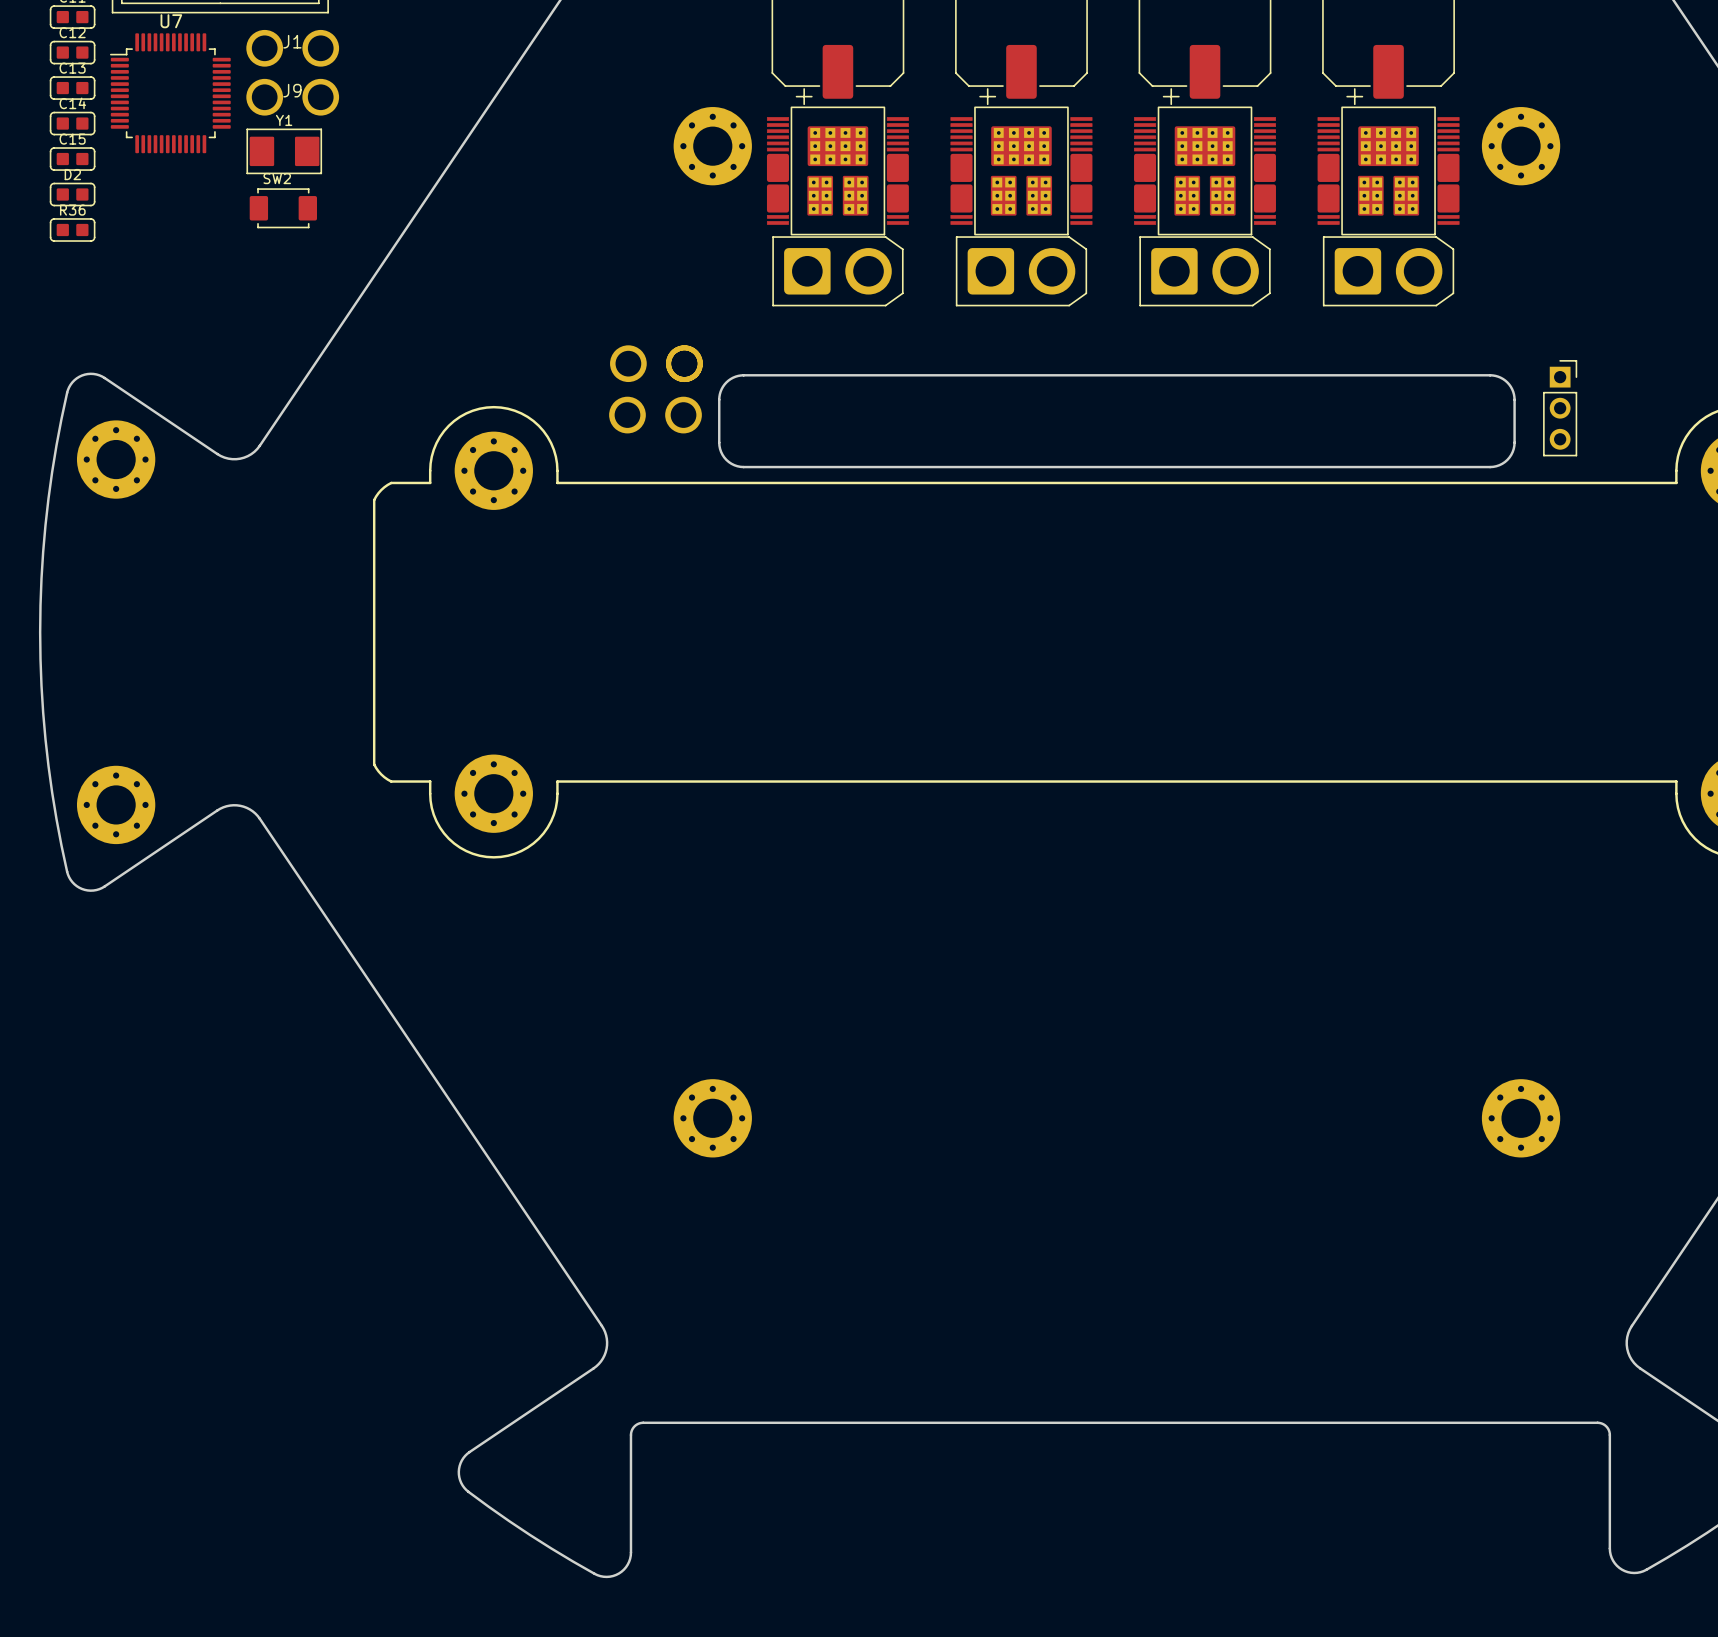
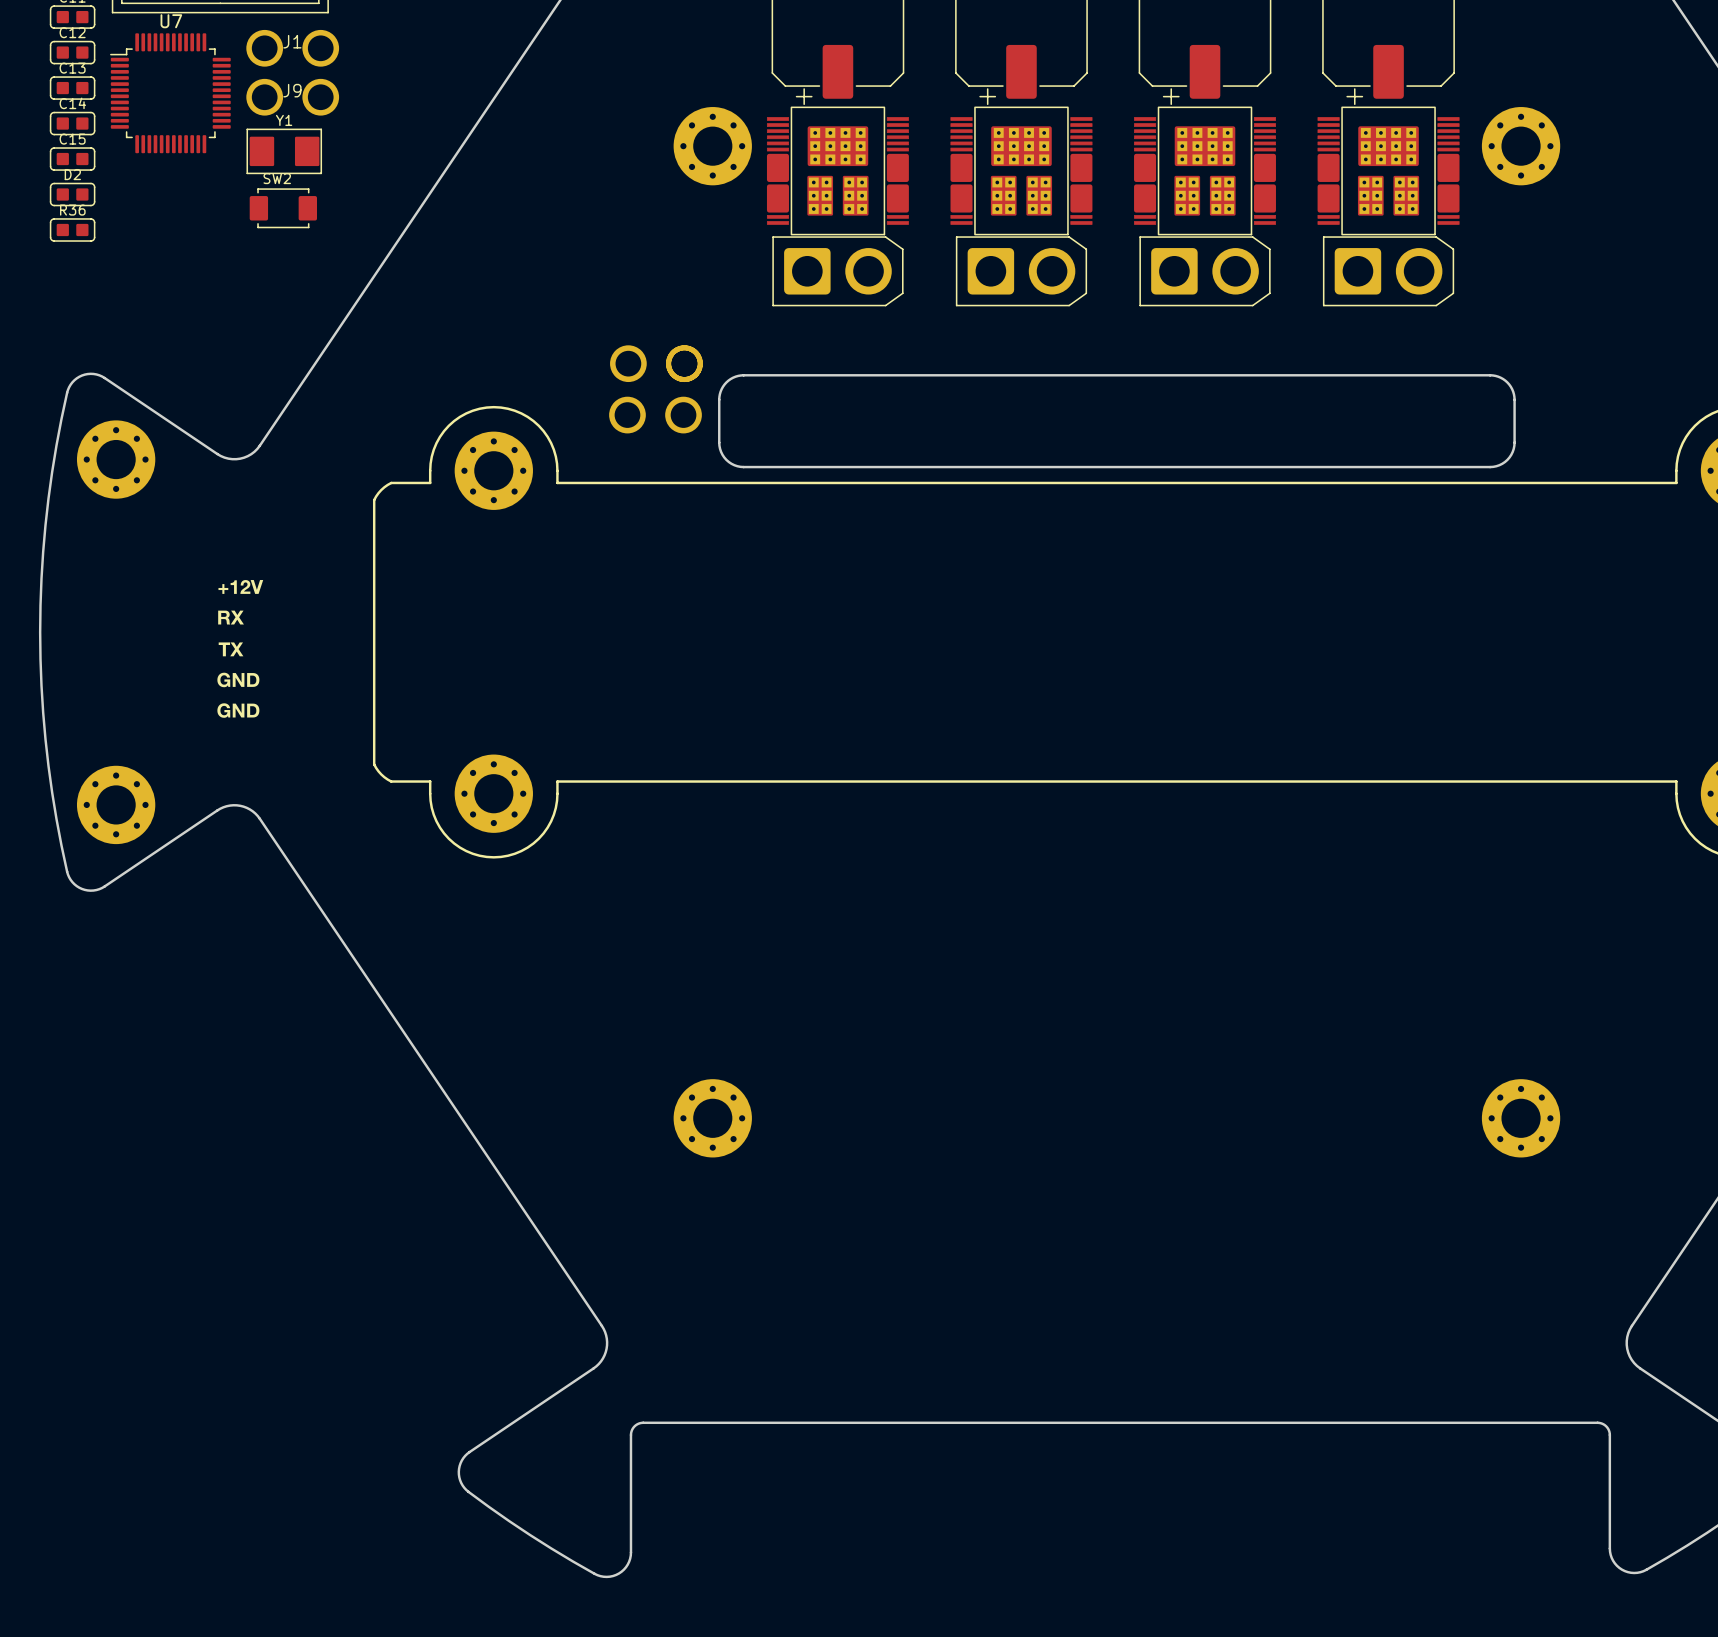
part: (1560, 408) -> none
drawing: none -> [218, 580, 264, 594]
drawing: none -> [218, 610, 244, 625]
drawing: none -> [218, 642, 244, 657]
drawing: none -> [217, 672, 260, 688]
drawing: none -> [217, 703, 260, 718]

